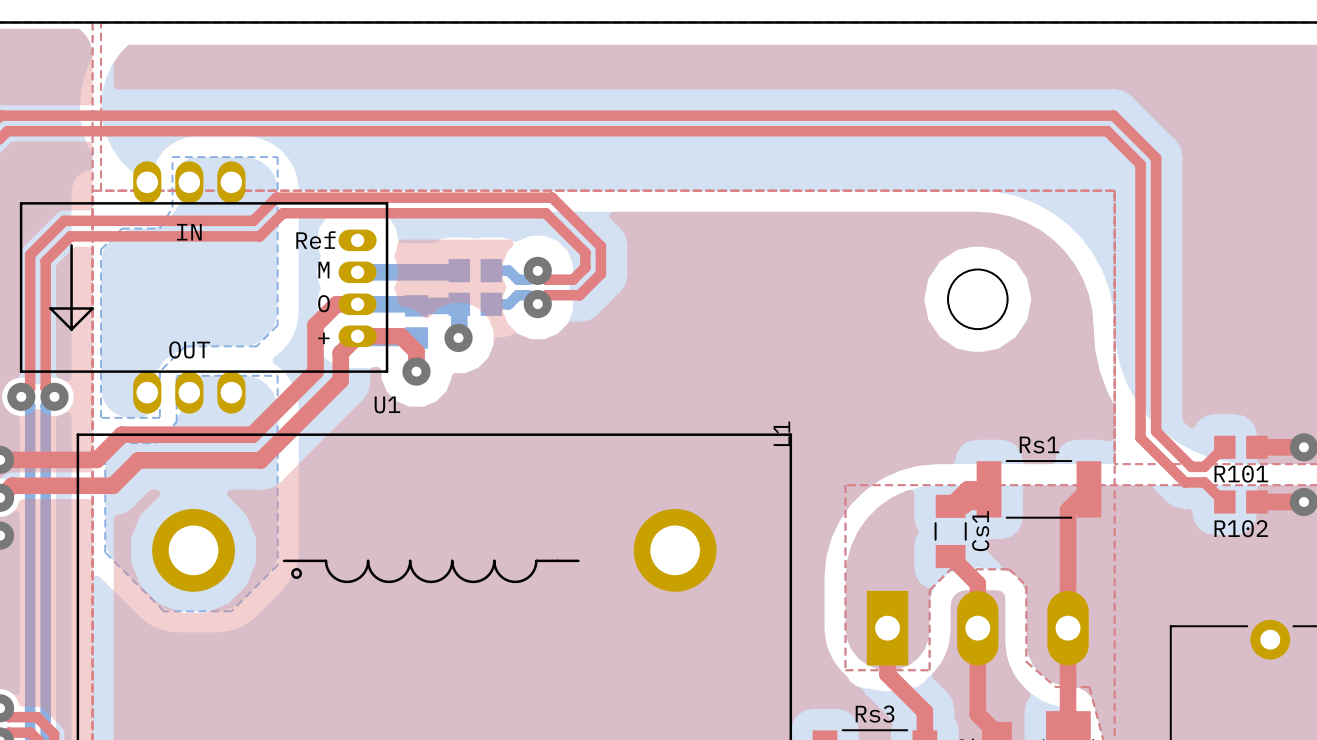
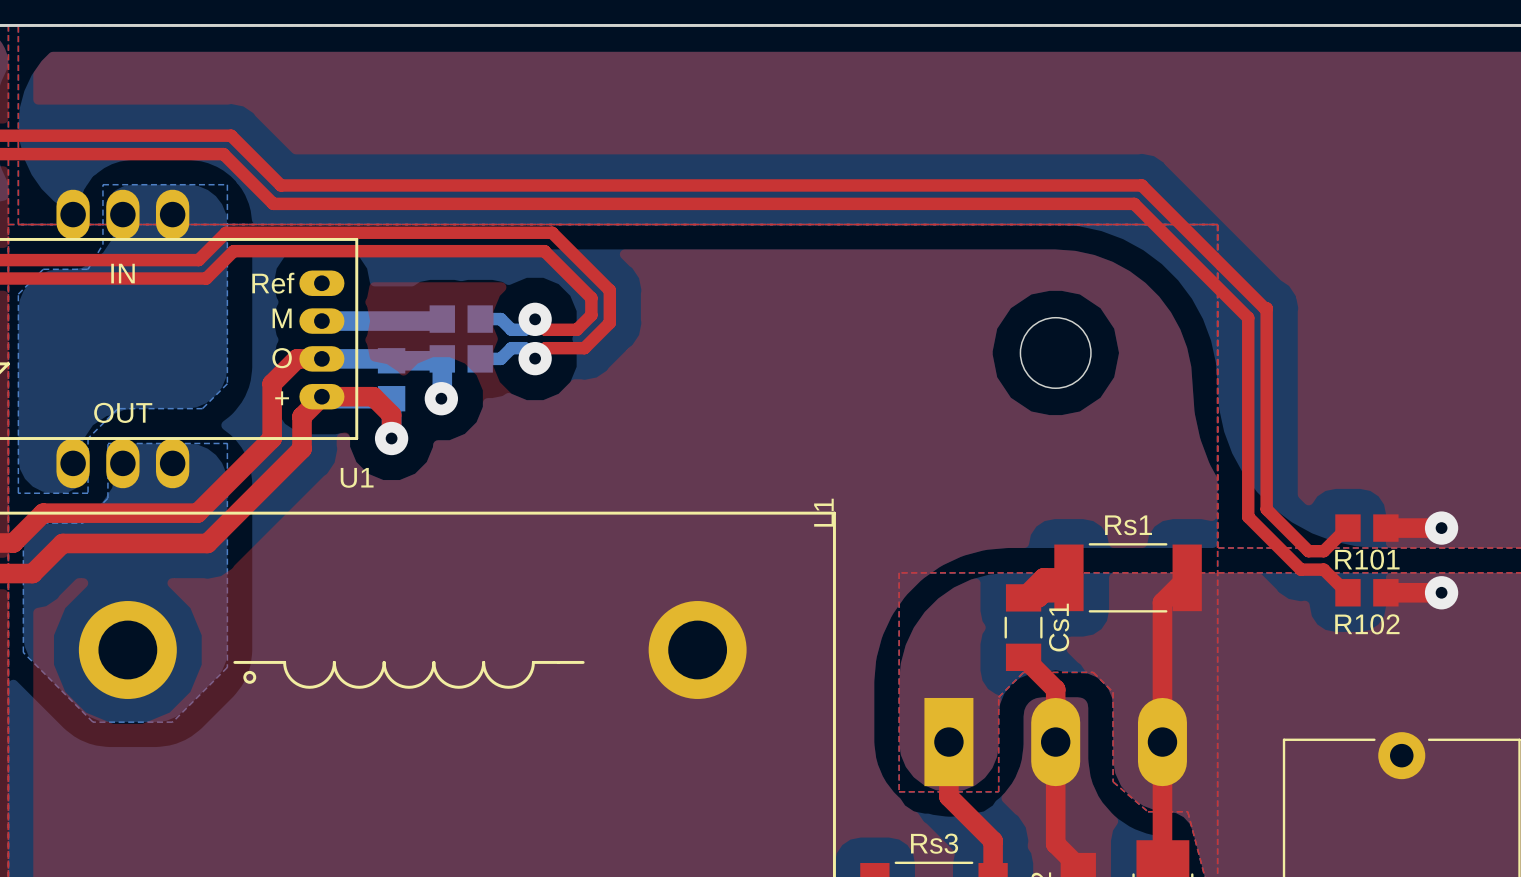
top track: (280, 115) (1113, 115) (1156, 158) (1156, 261) -> (231, 135) (280, 185) (1141, 185) (1266, 308)
top track: (274, 131) (1107, 131) (1140, 164) (1140, 269) -> (223, 154) (273, 203) (1134, 203) (1248, 317)

